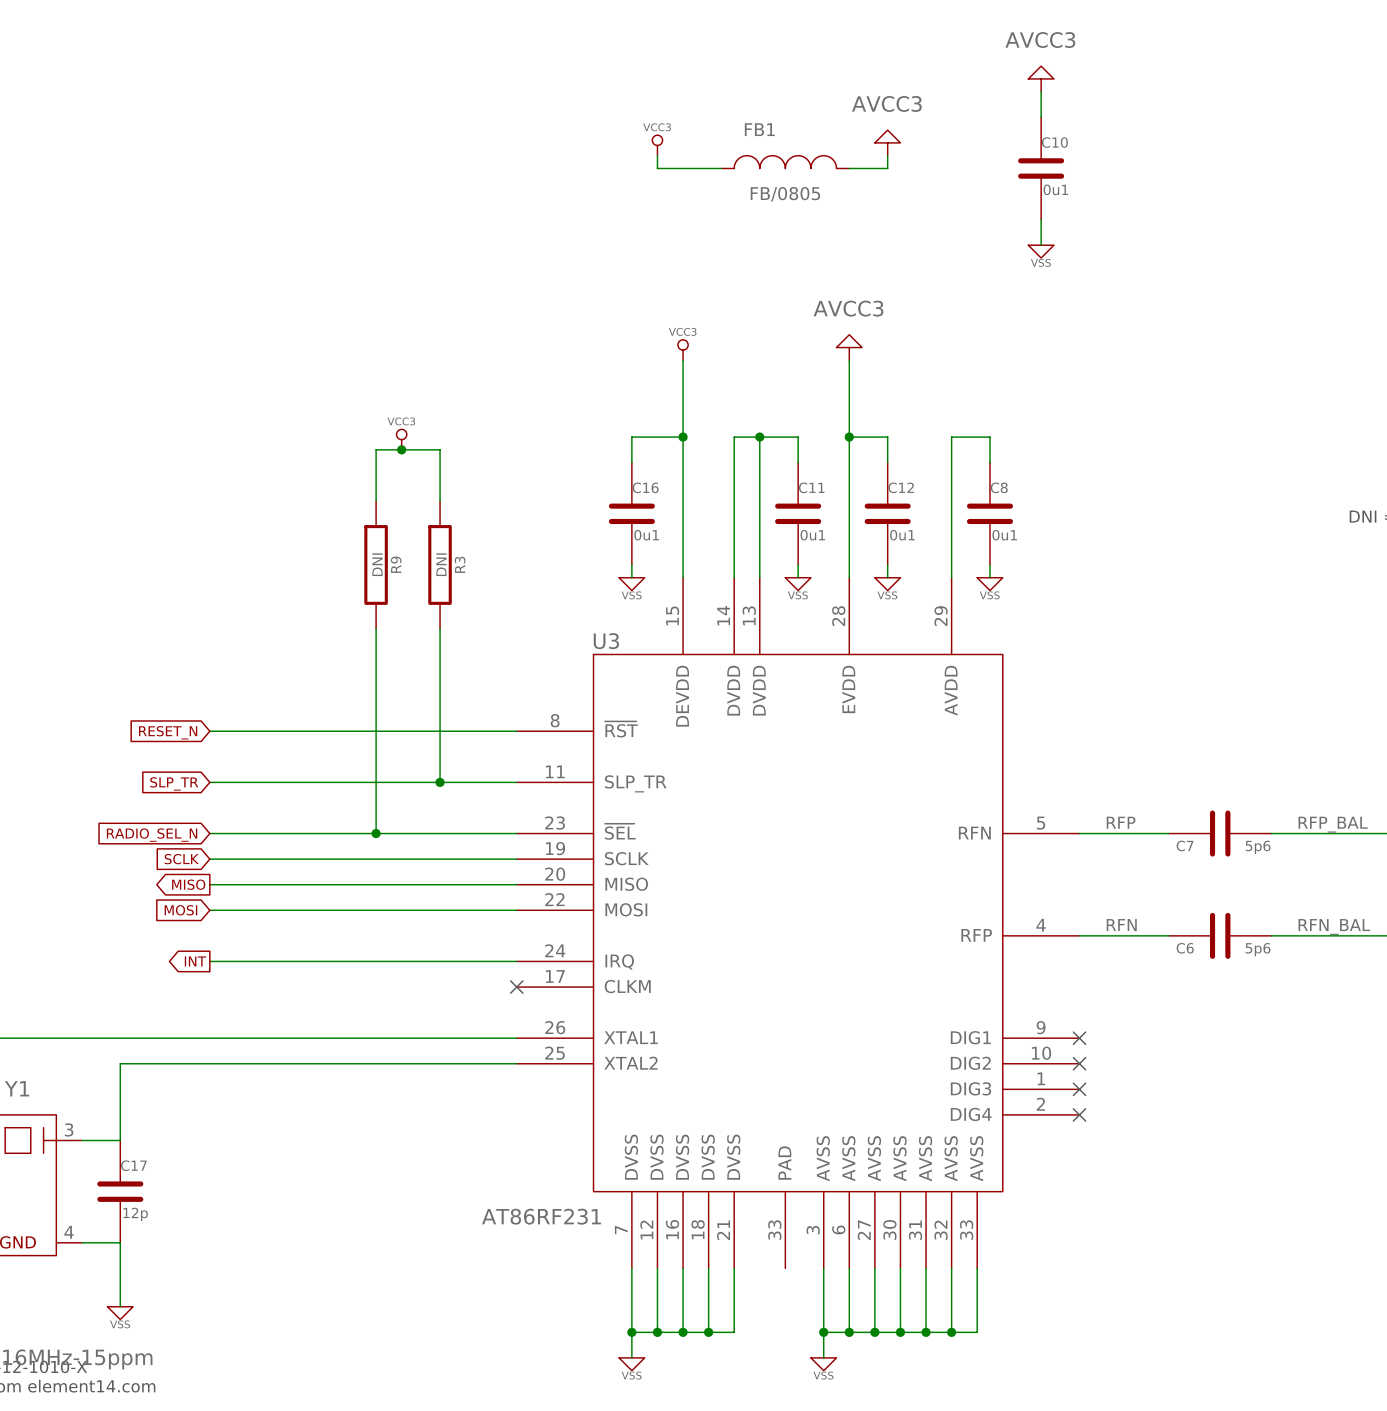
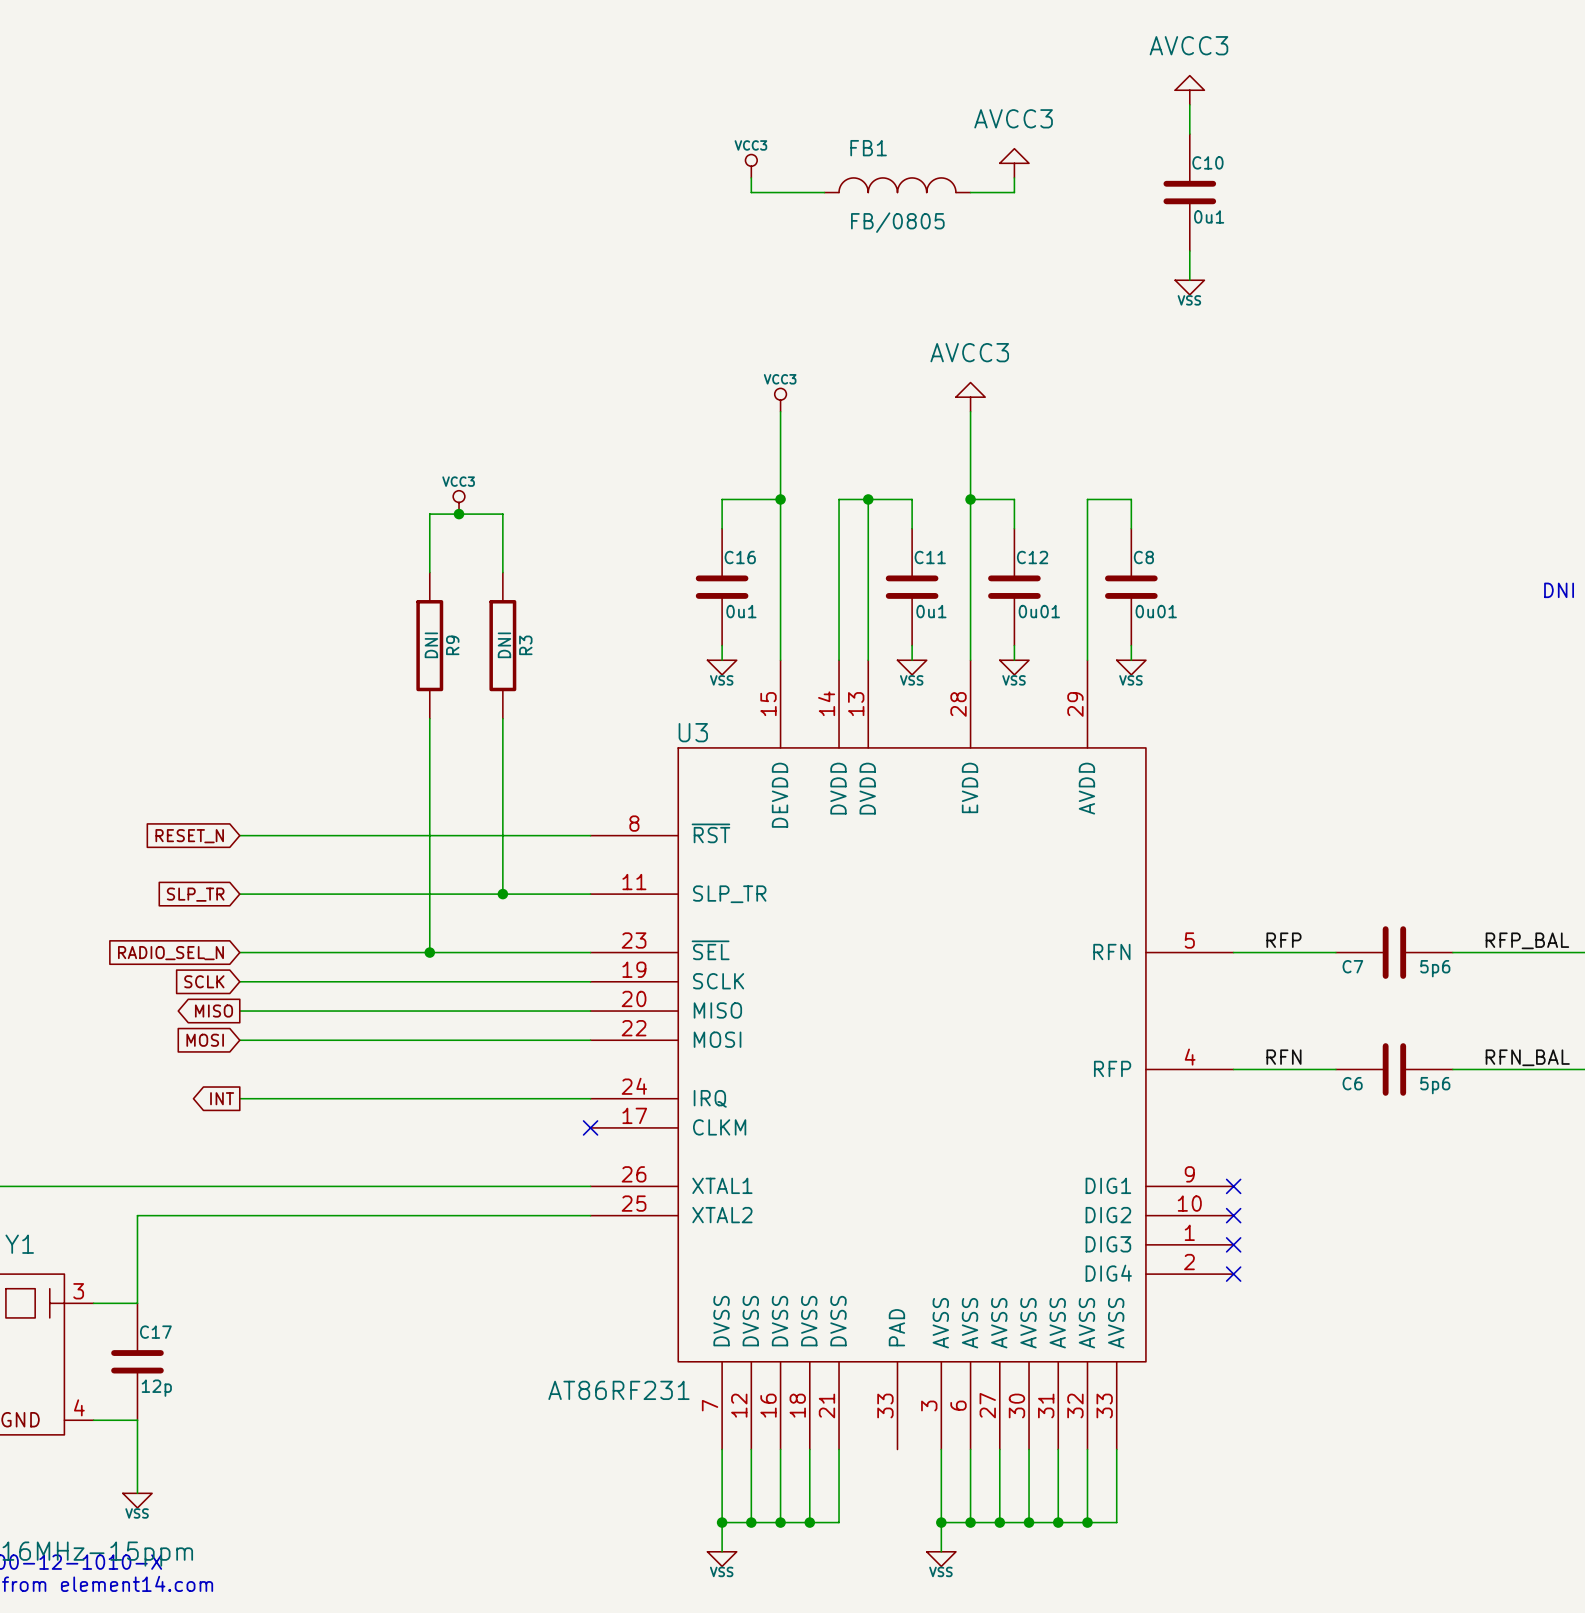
C12 value: 0u1 (902, 535) -> 0u01 (1039, 611)
C8 value: 0u1 (1004, 535) -> 0u01 (1156, 611)

